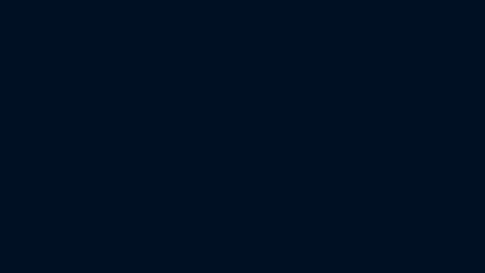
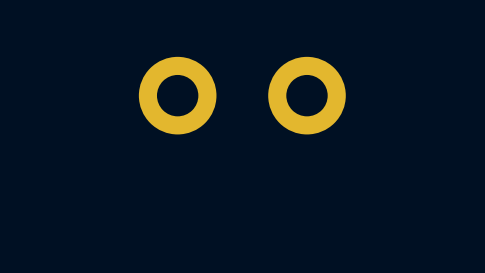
part: none -> (242, 95)

